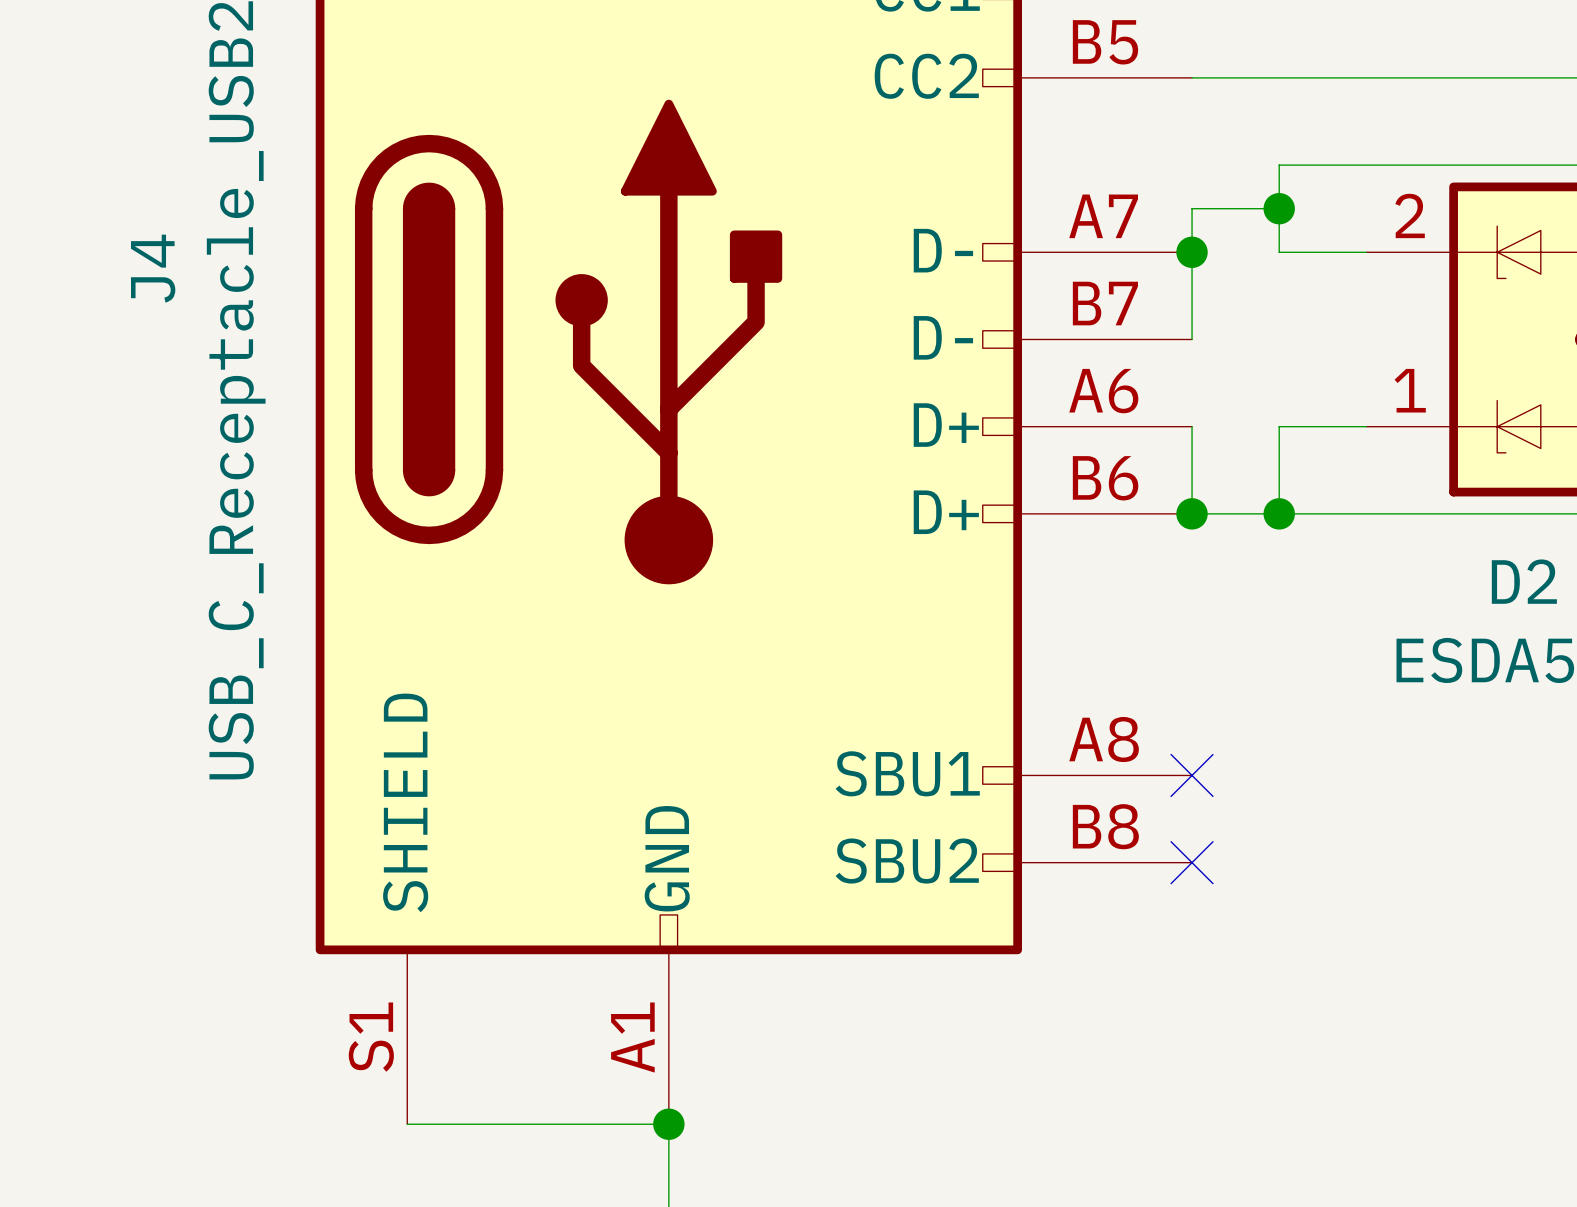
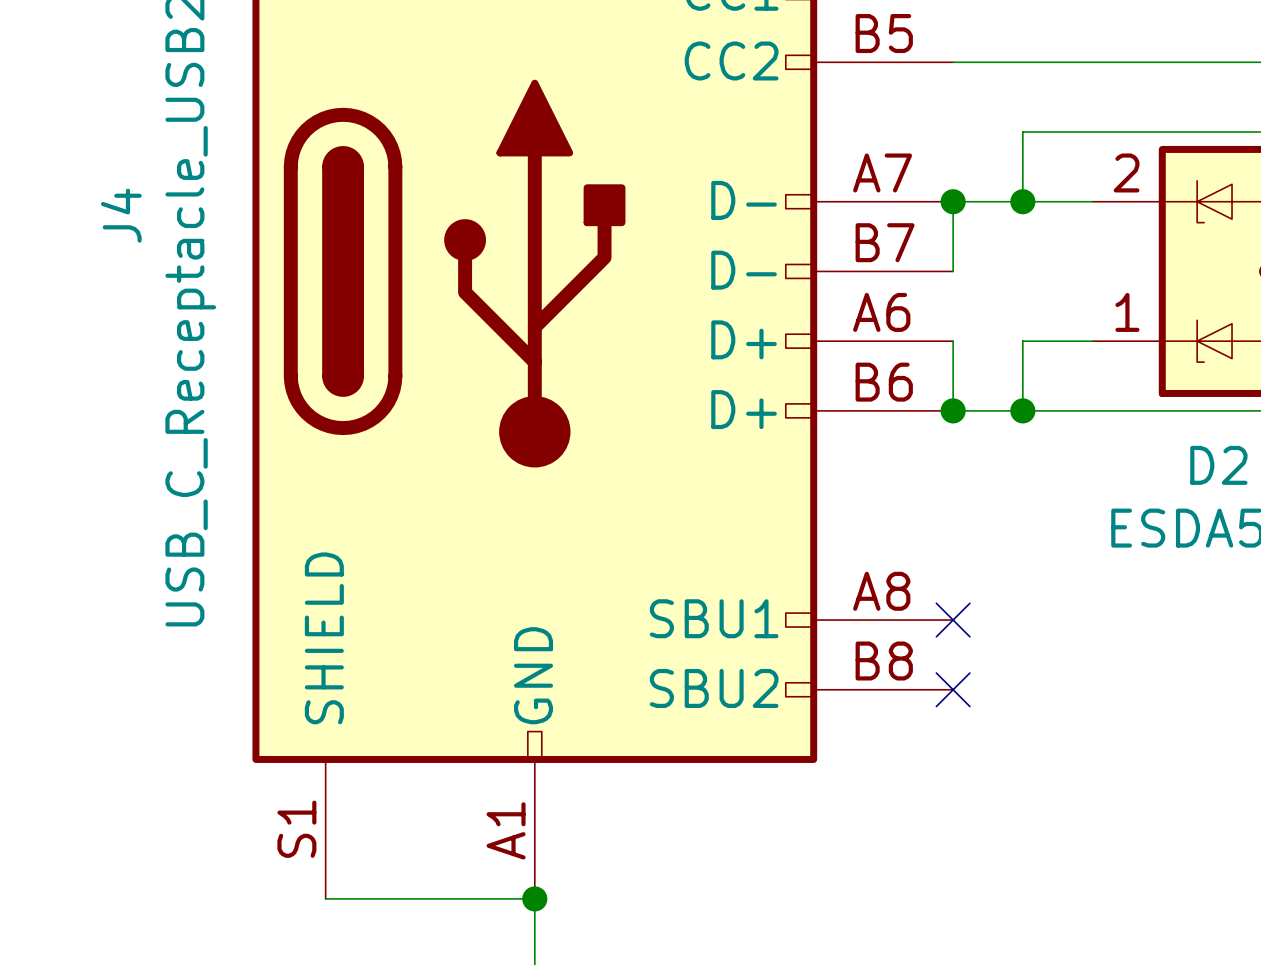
wire: (1279, 208) (1192, 208) (1192, 252) -> (1022, 201) (953, 201)
junction position: (1279, 208) -> (1022, 201)

